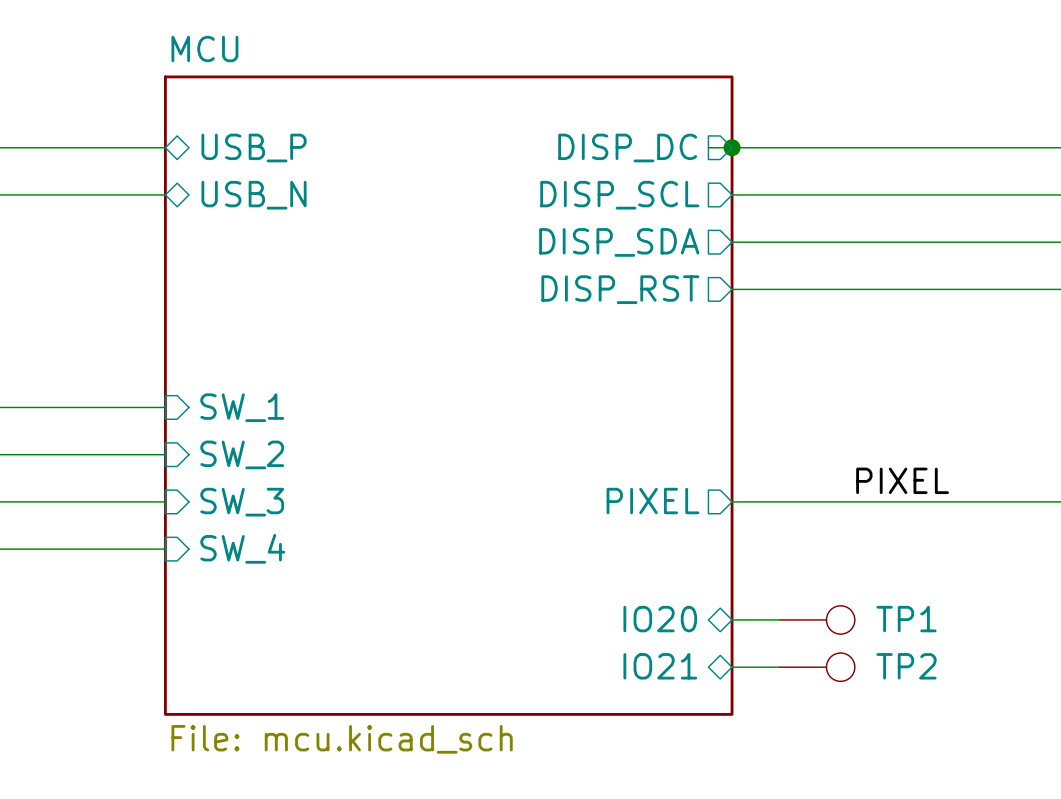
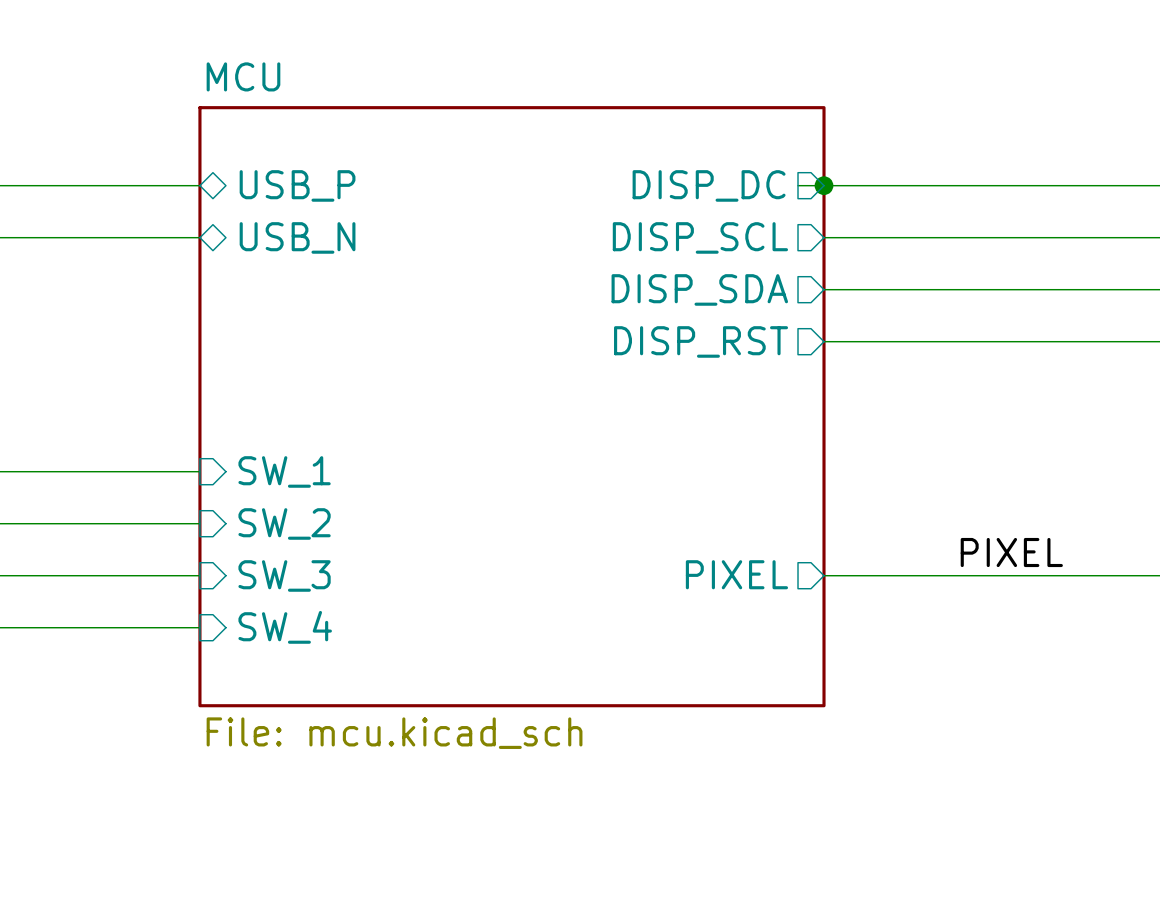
sheet MCU: none -> File: mcu.kicad_sch (511, 406)
sheet MCU: File: mcu.kicad_sch (448, 395) -> none
sheet pin: IO20 (660, 619) -> none
wire: (732, 619) (779, 619) -> none
TP1: (817, 619) -> none
sheet pin: IO21 (660, 666) -> none
wire: (732, 667) (779, 667) -> none
TP2: (817, 667) -> none

